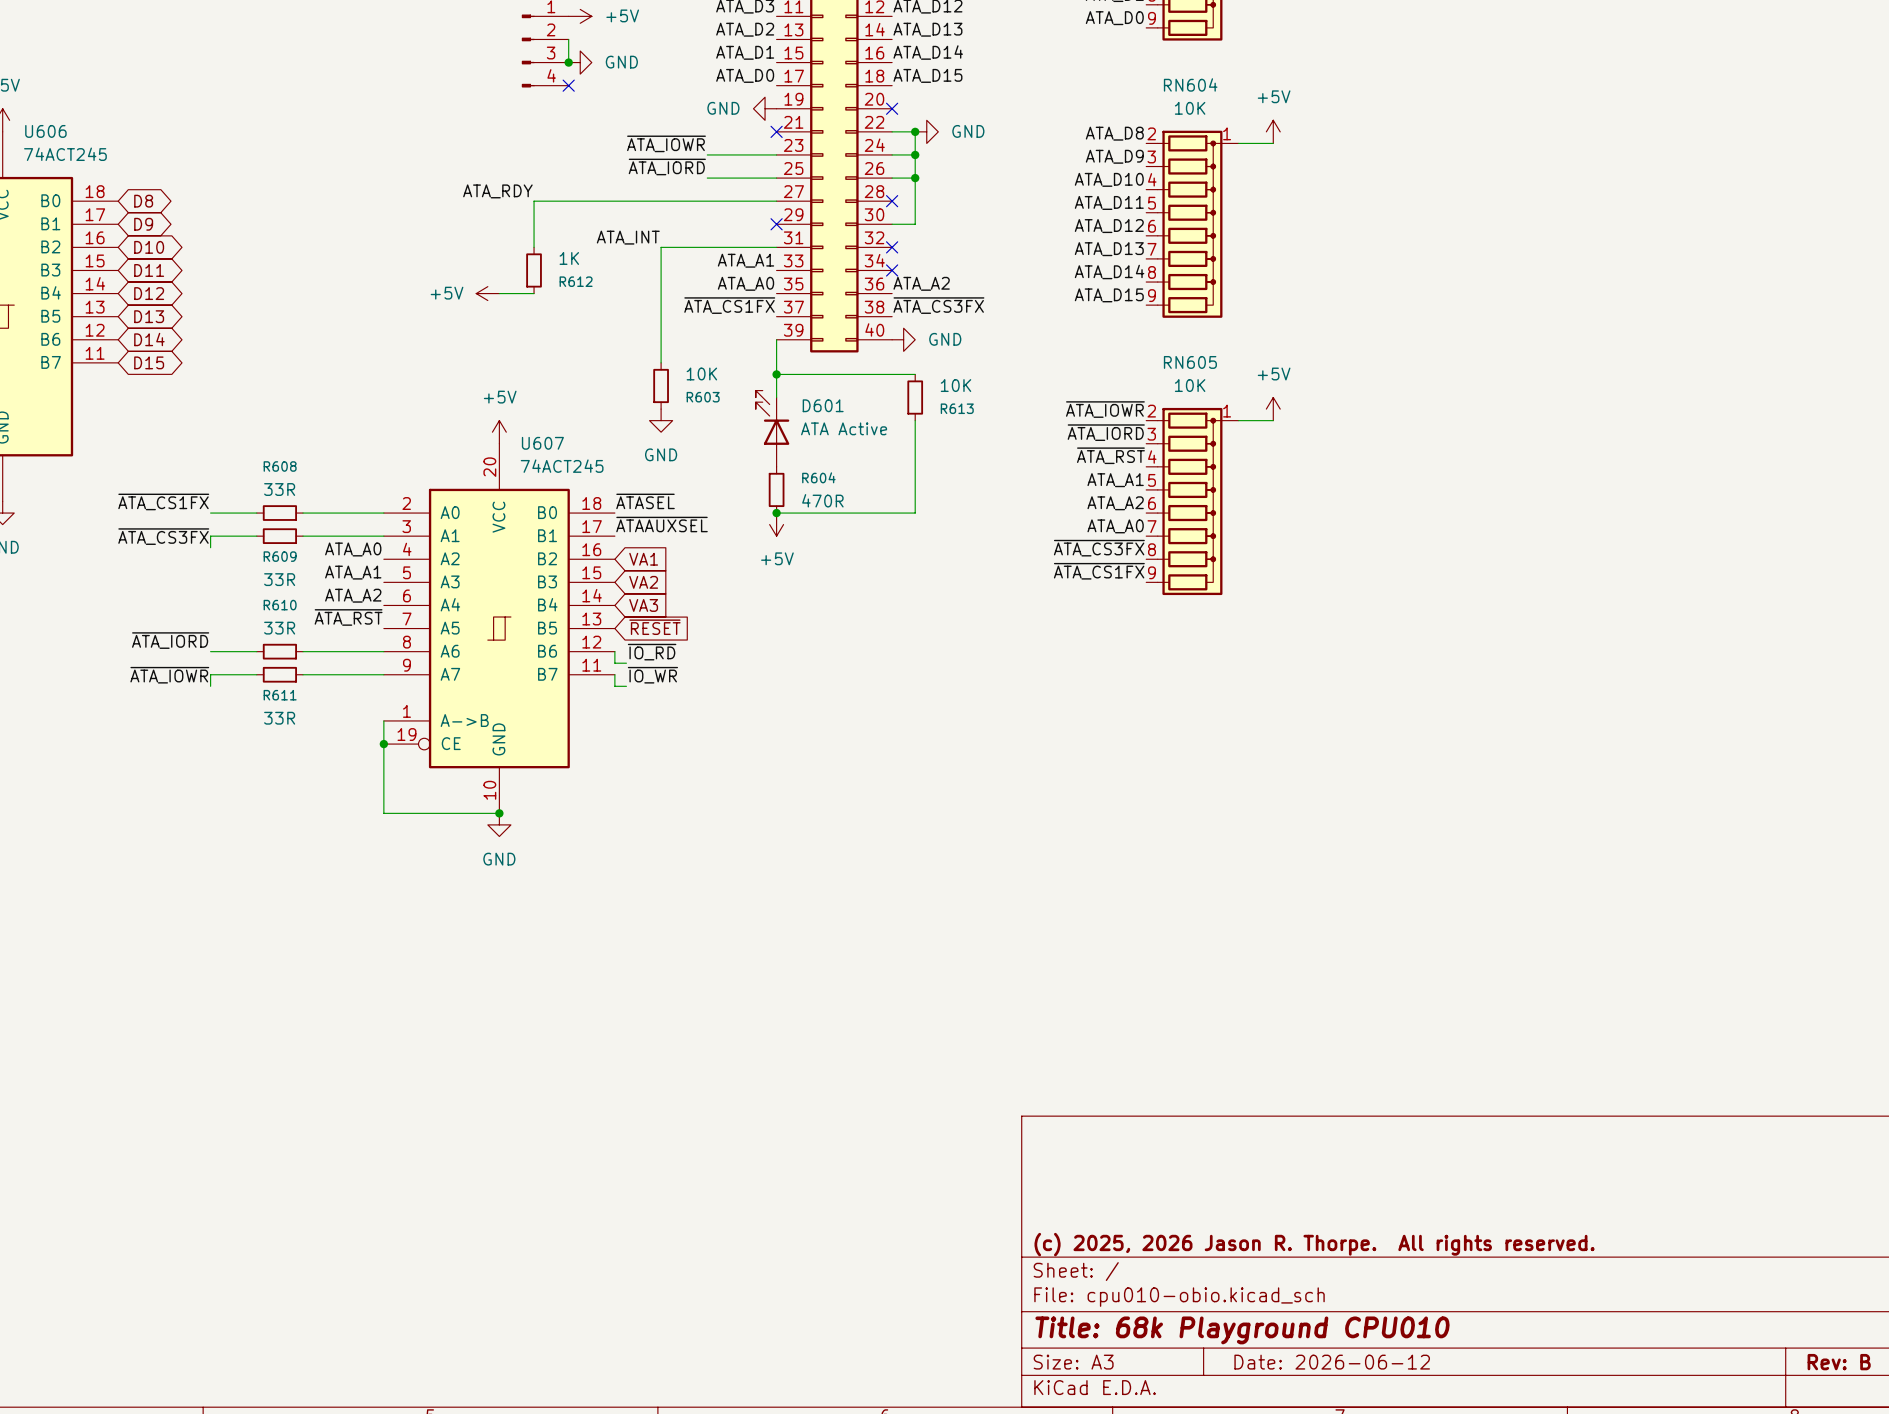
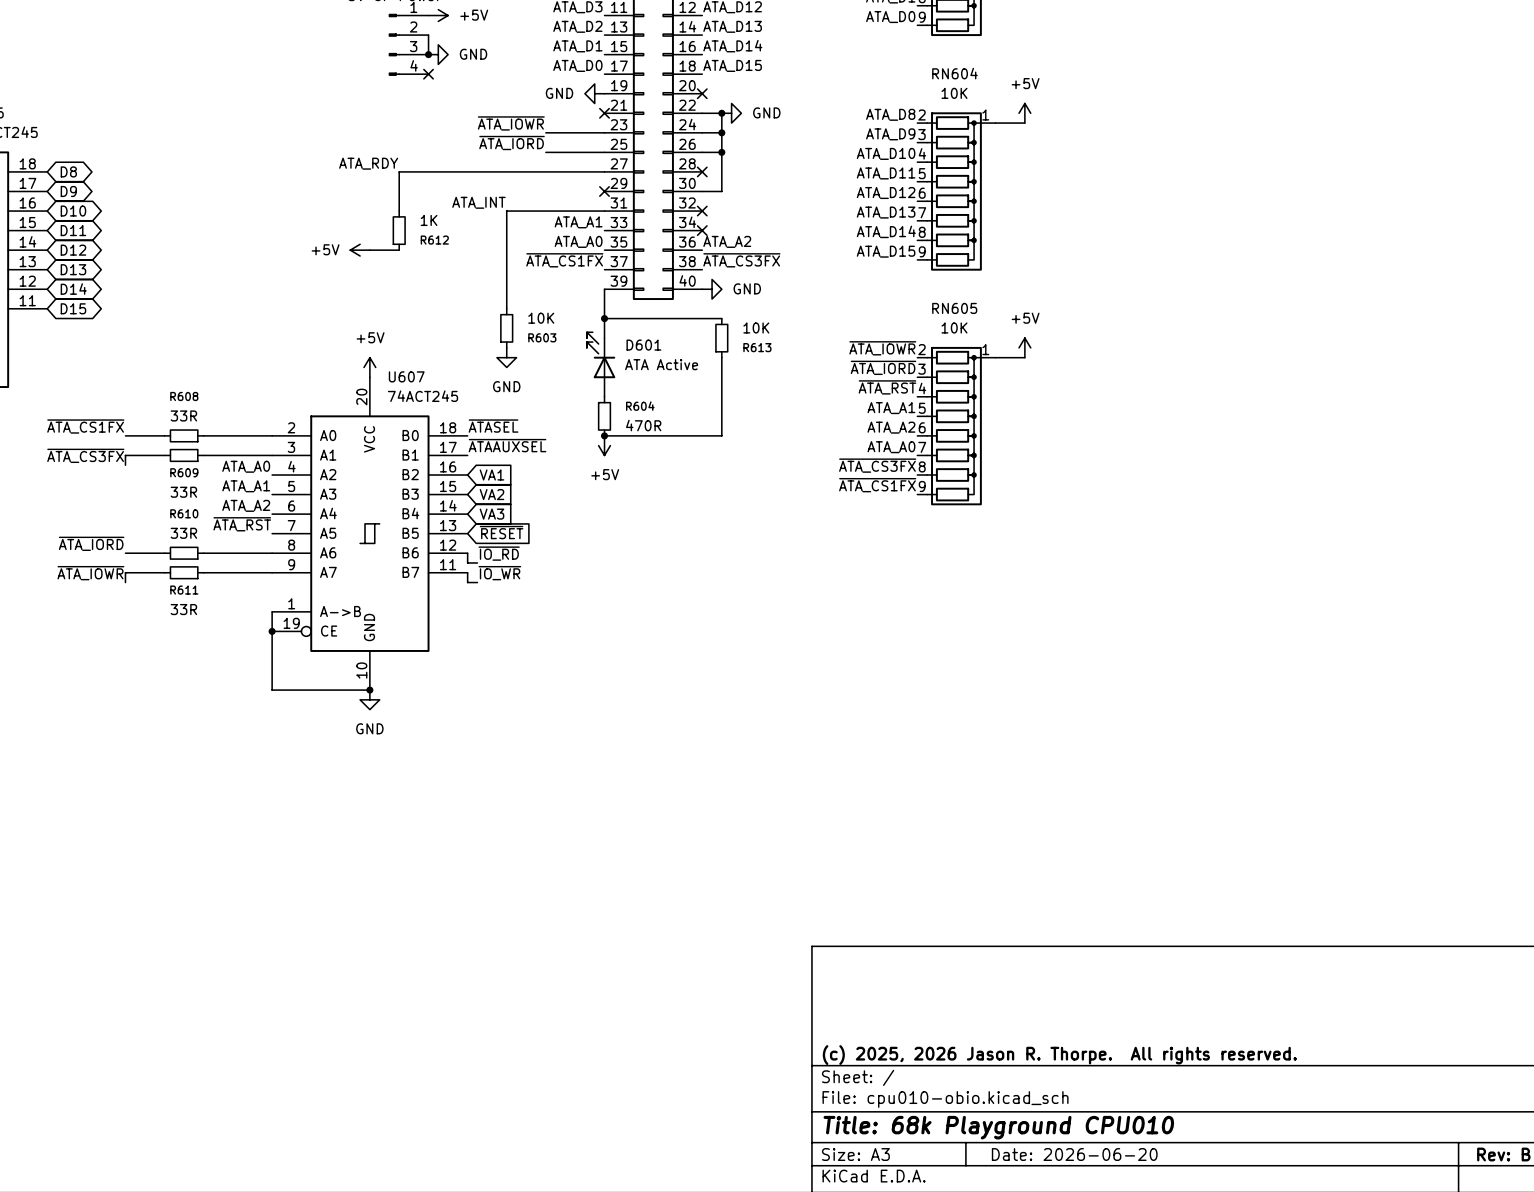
title block: Date: 2026-06-12 (1332, 1362) -> Date: 2026-06-20 (1074, 1154)

